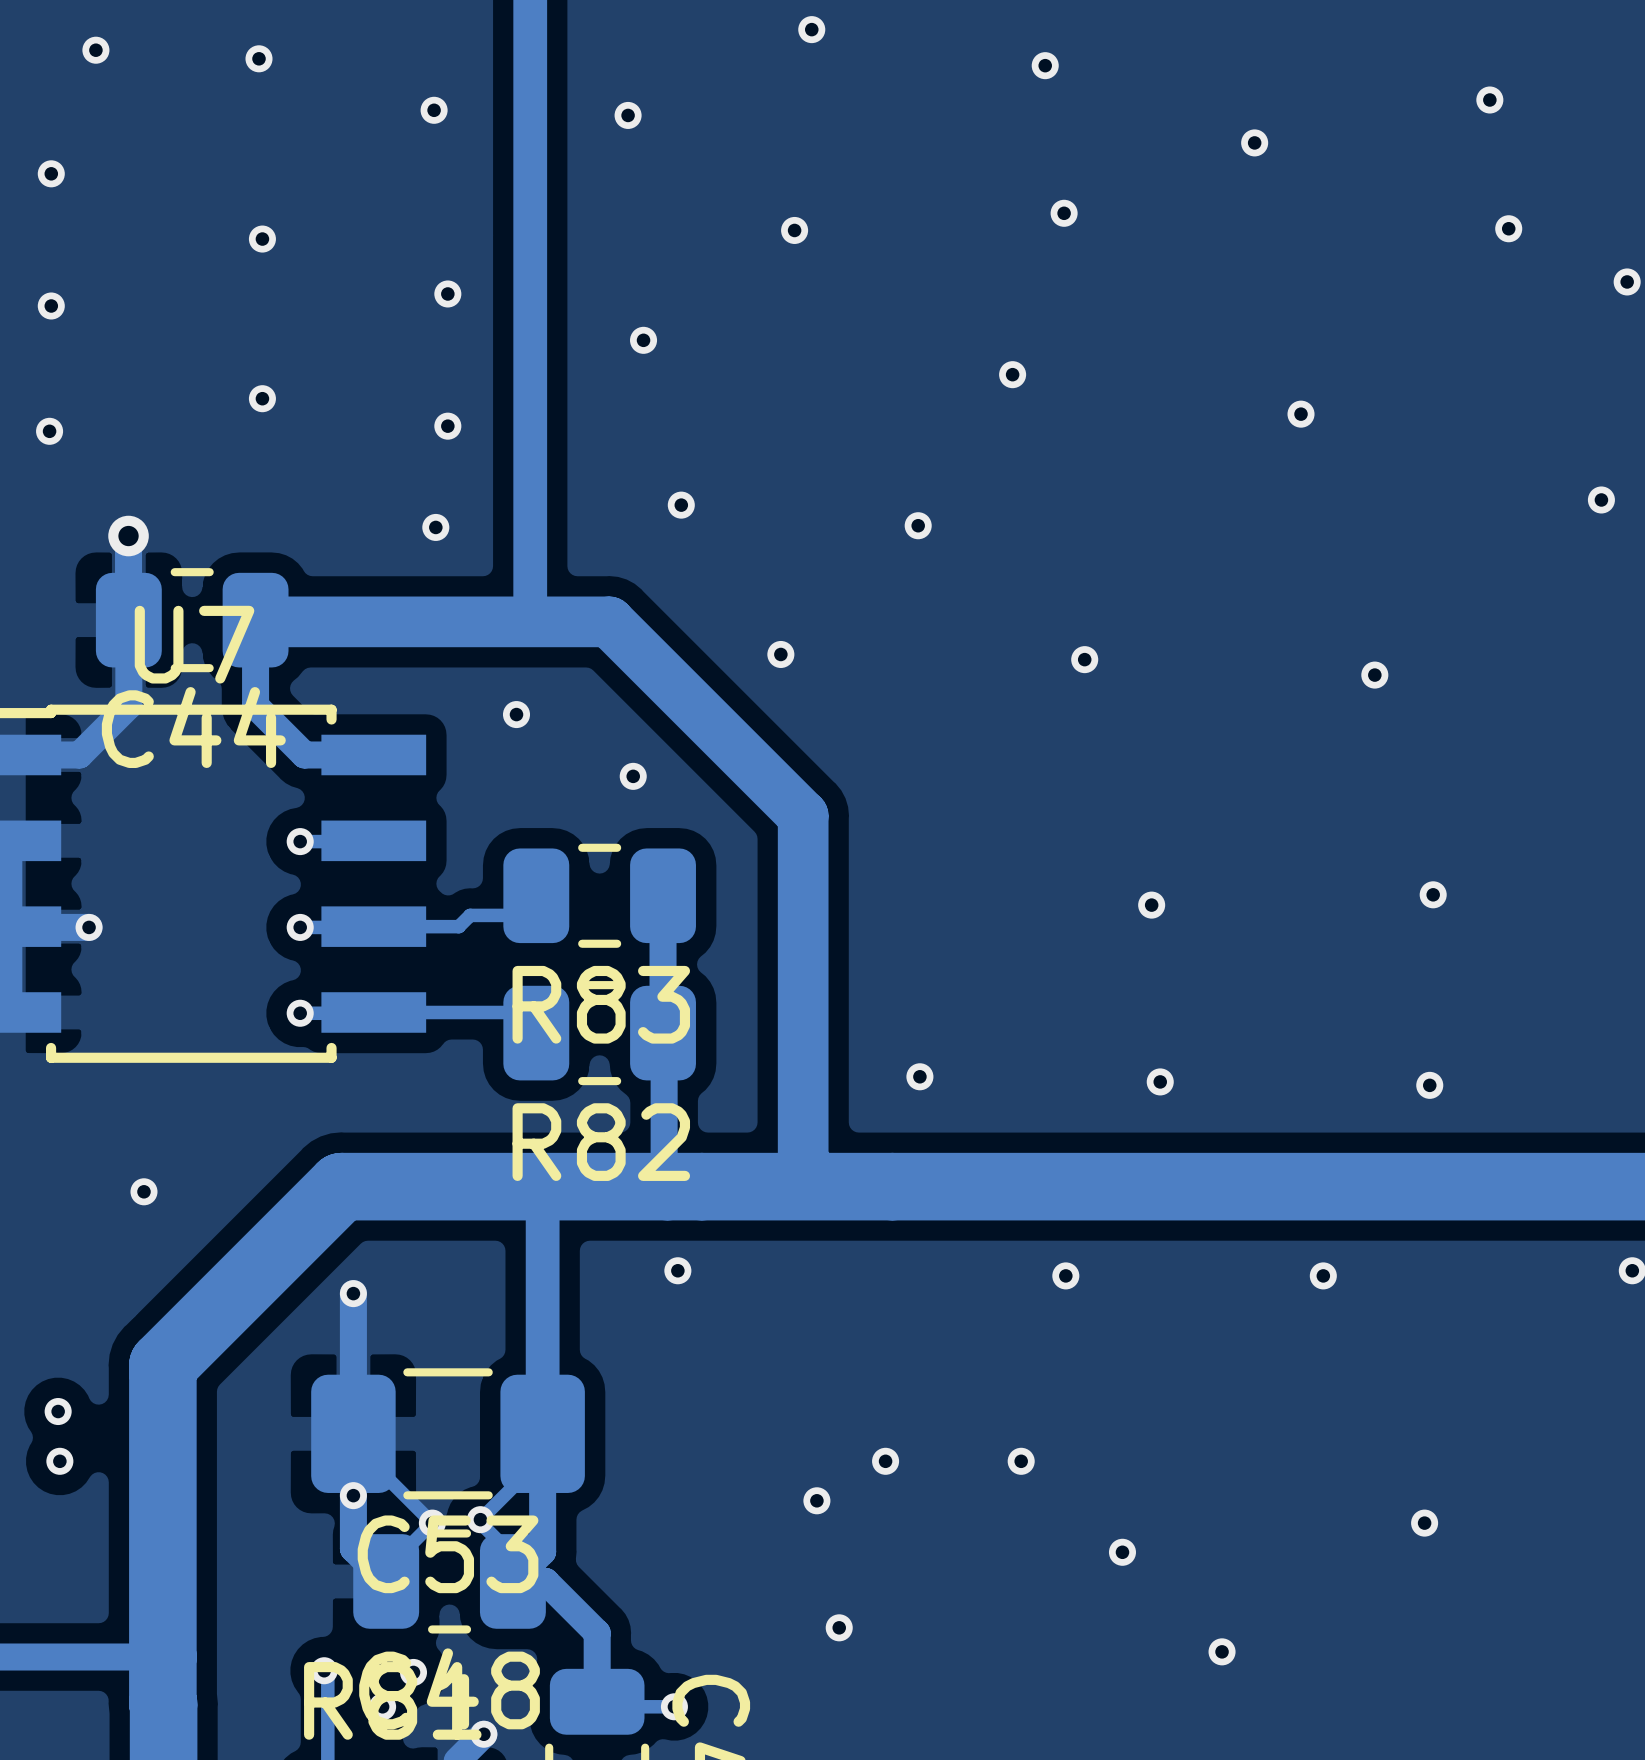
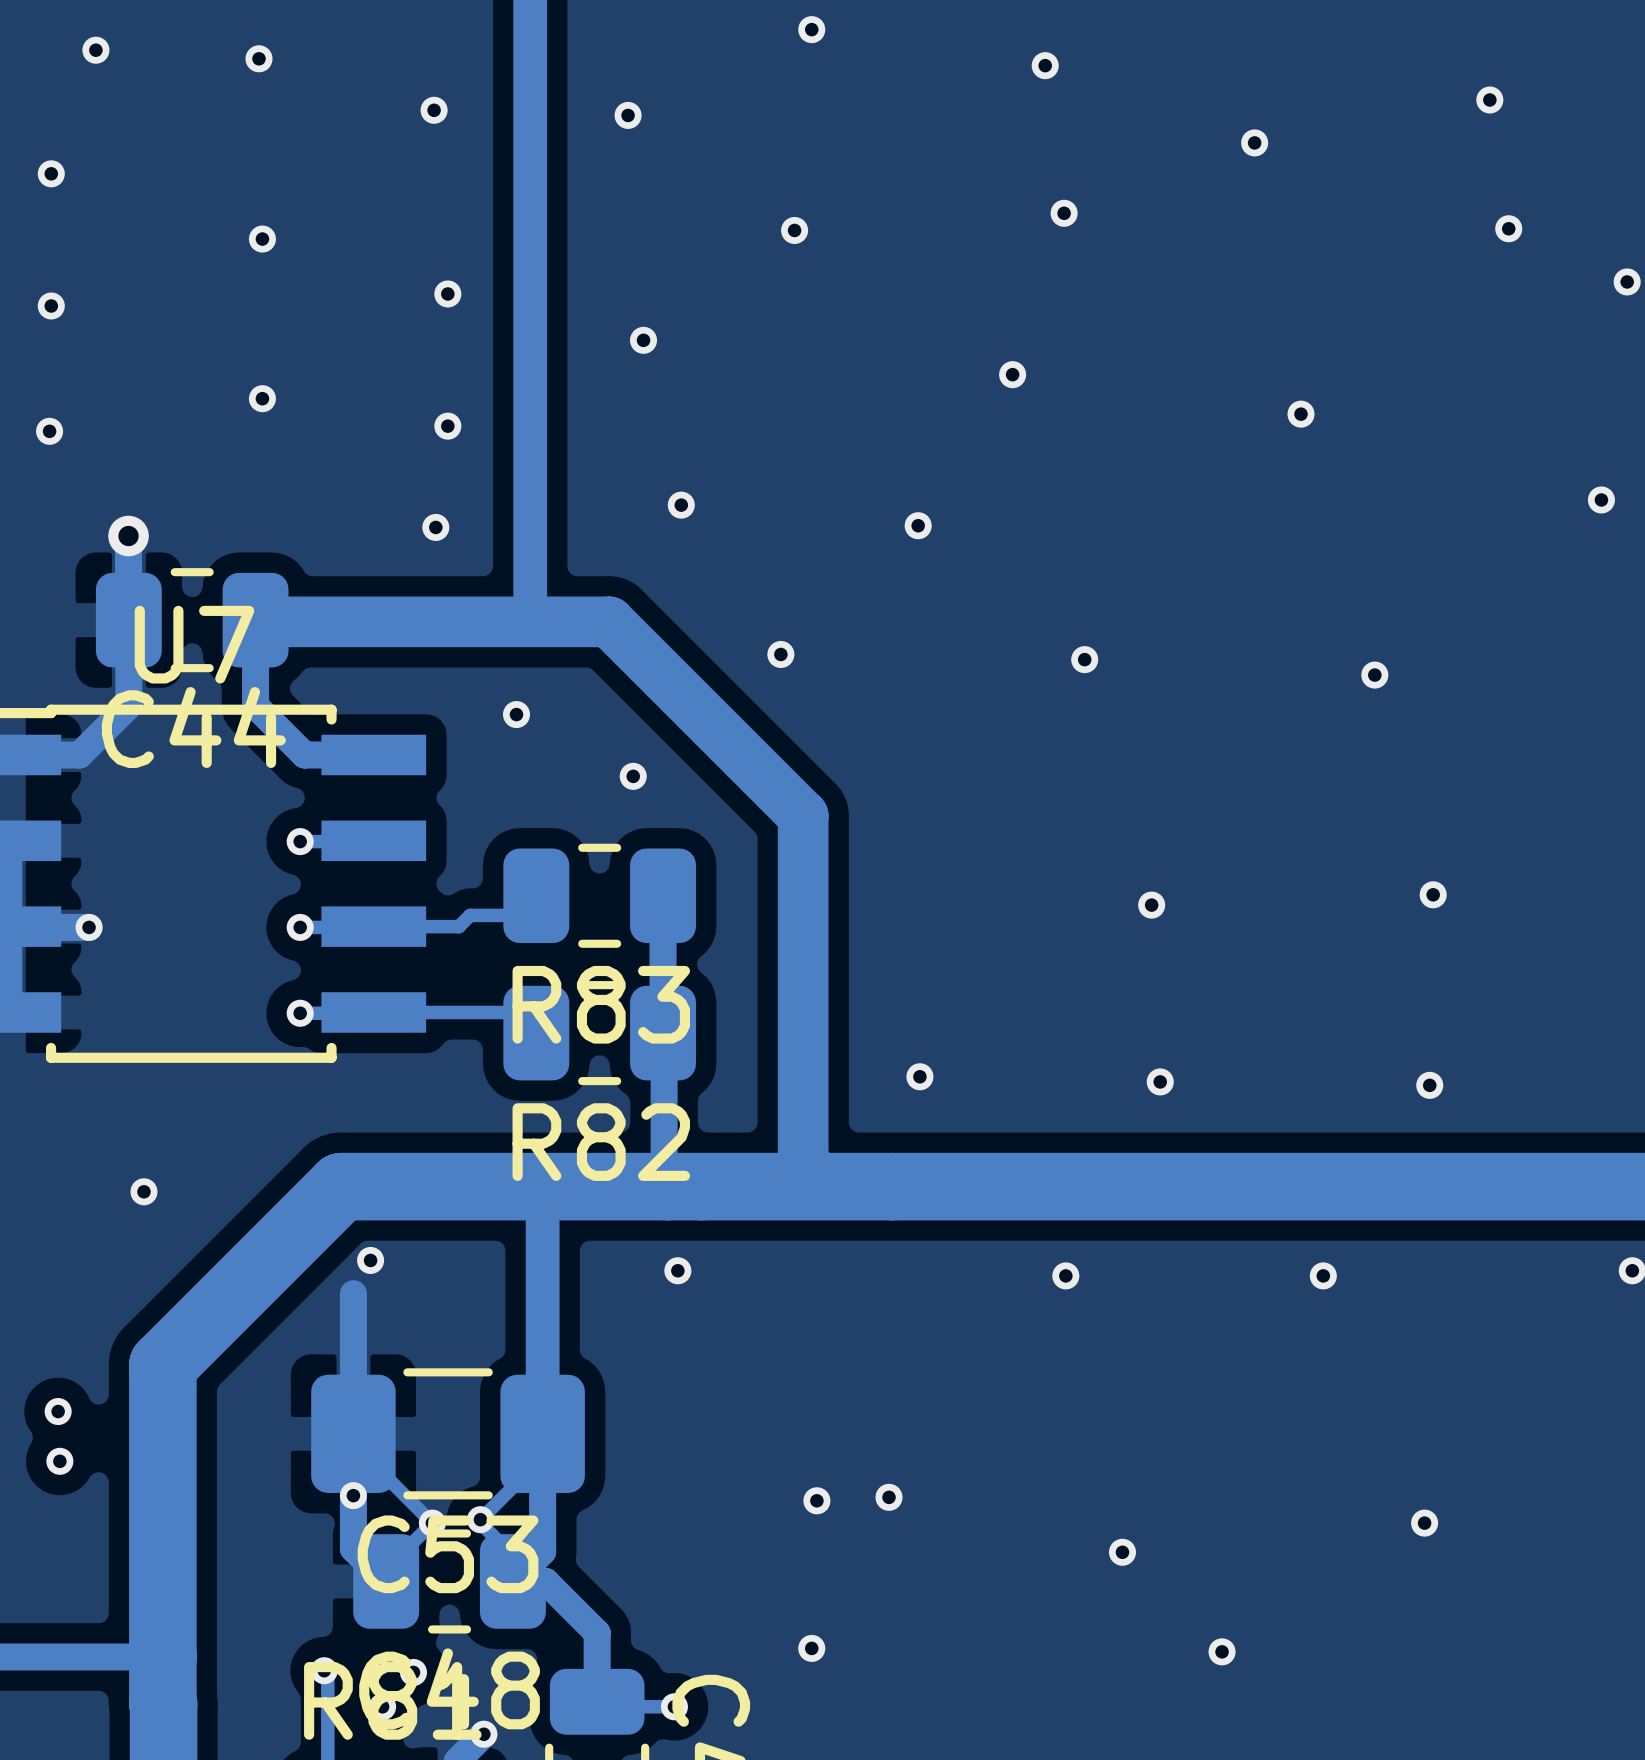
via position: (353, 1293) -> (370, 1260)
via position: (885, 1461) -> (889, 1497)
via: (1021, 1461) -> none
via position: (839, 1627) -> (811, 1648)

